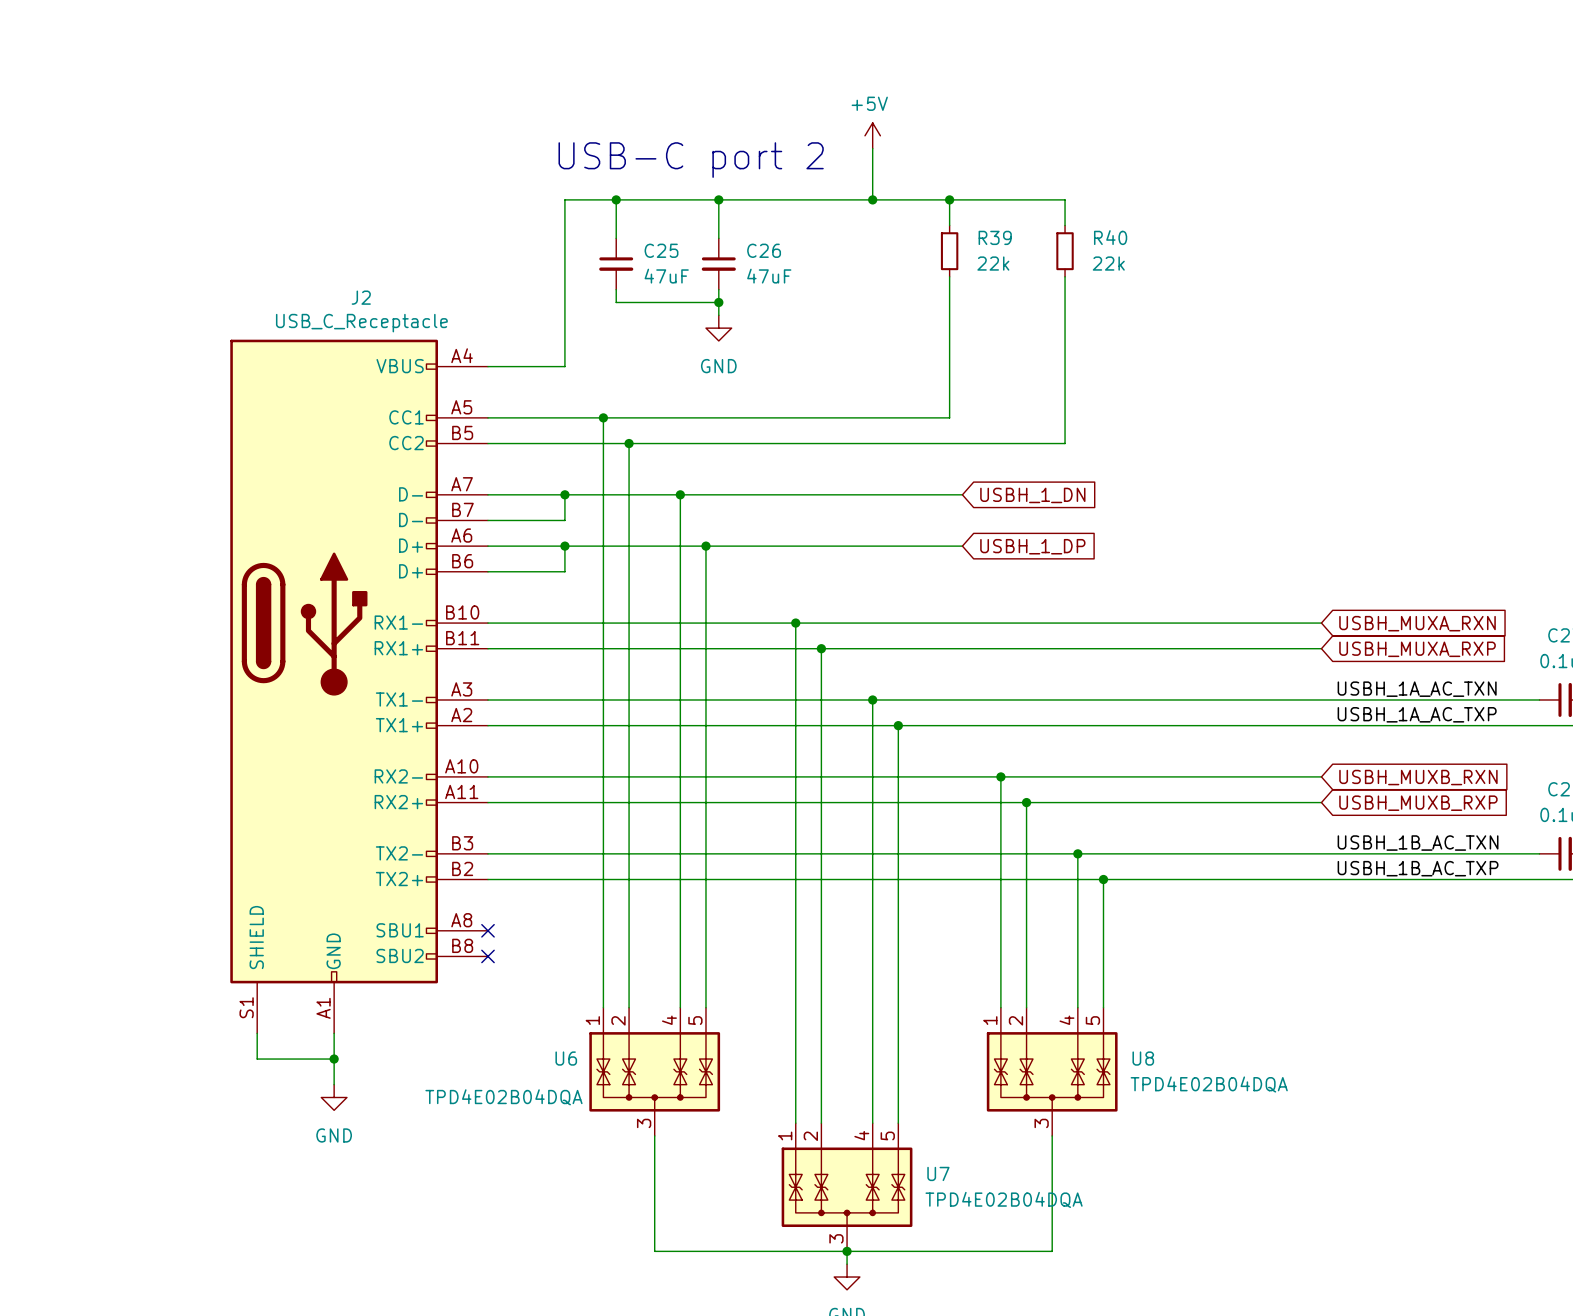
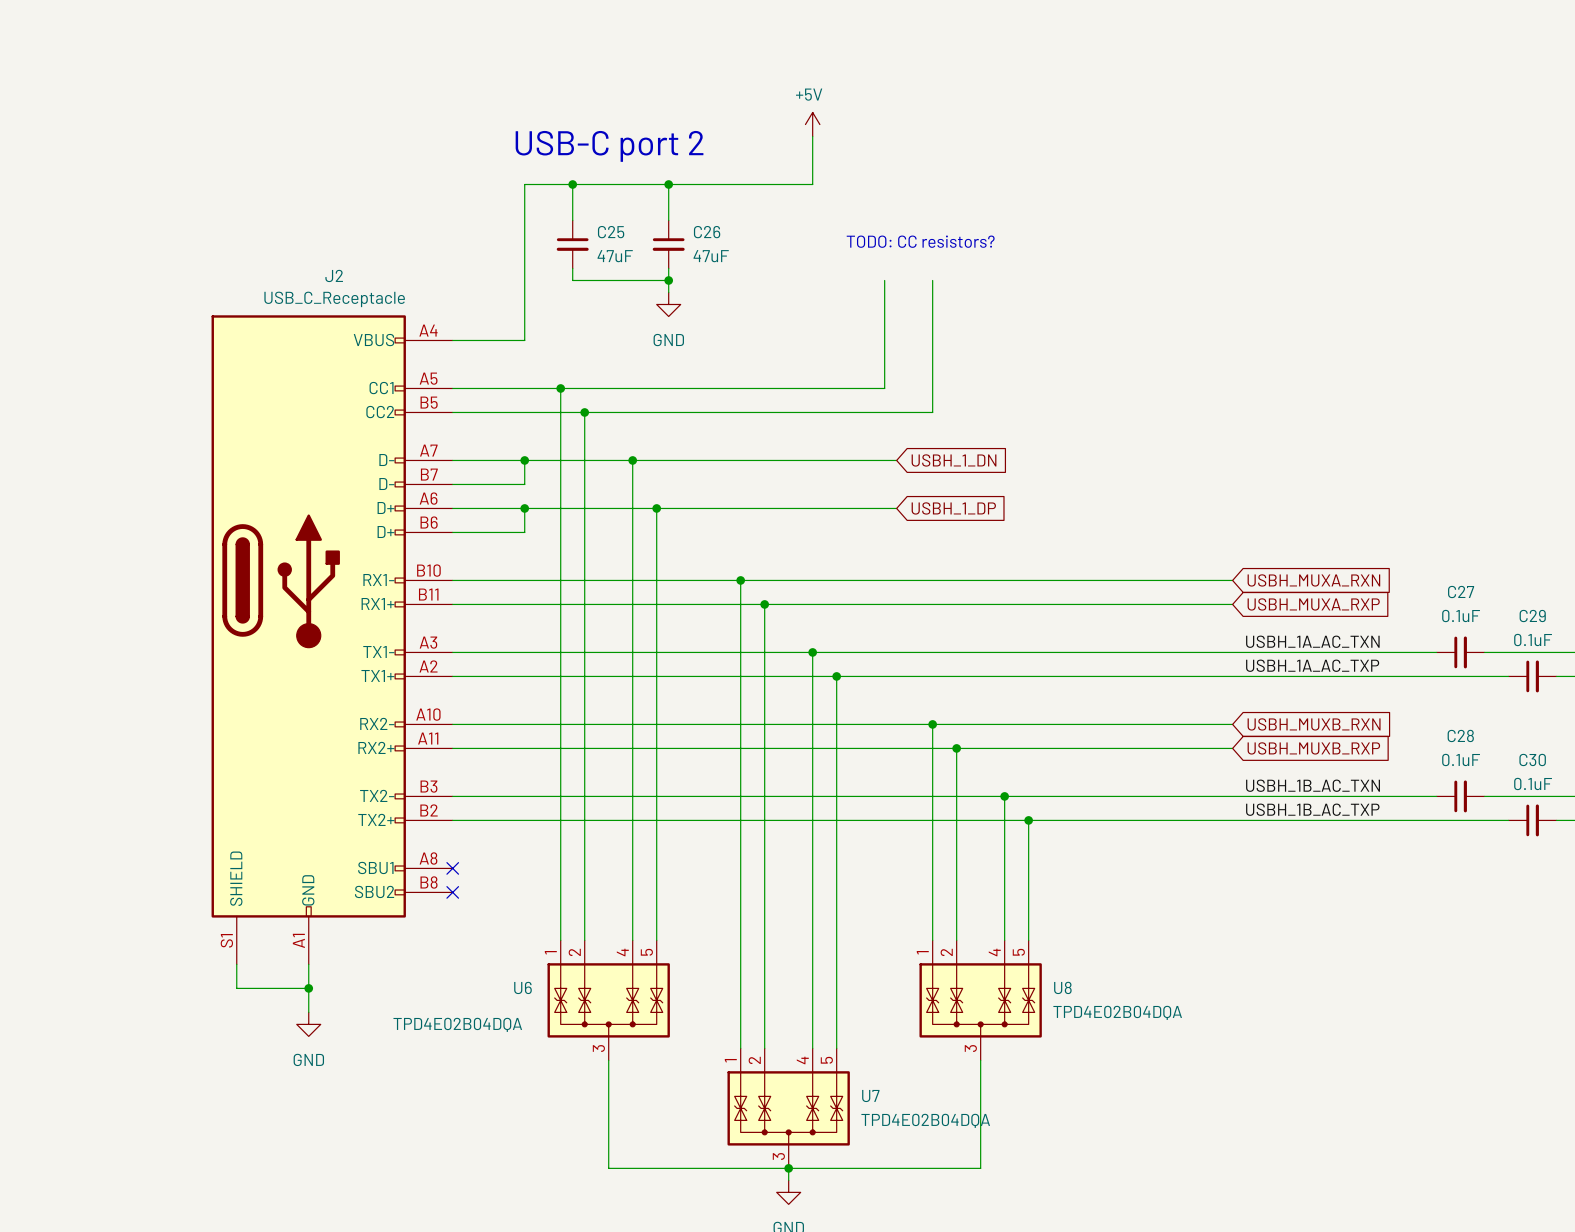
wire: (872, 199) (1065, 199) (1065, 225) -> none
junction: (872, 199) -> none
wire: (949, 199) (949, 225) -> none
junction: (949, 199) -> none
R39: 22k (949, 251) -> none
R40: 22k (1065, 251) -> none
text: none -> TODO: CC resistors? (920, 241)
wire: (949, 276) (949, 302) -> none
wire: (1065, 276) (1065, 443) (1000, 443) -> (932, 280) (932, 412)

